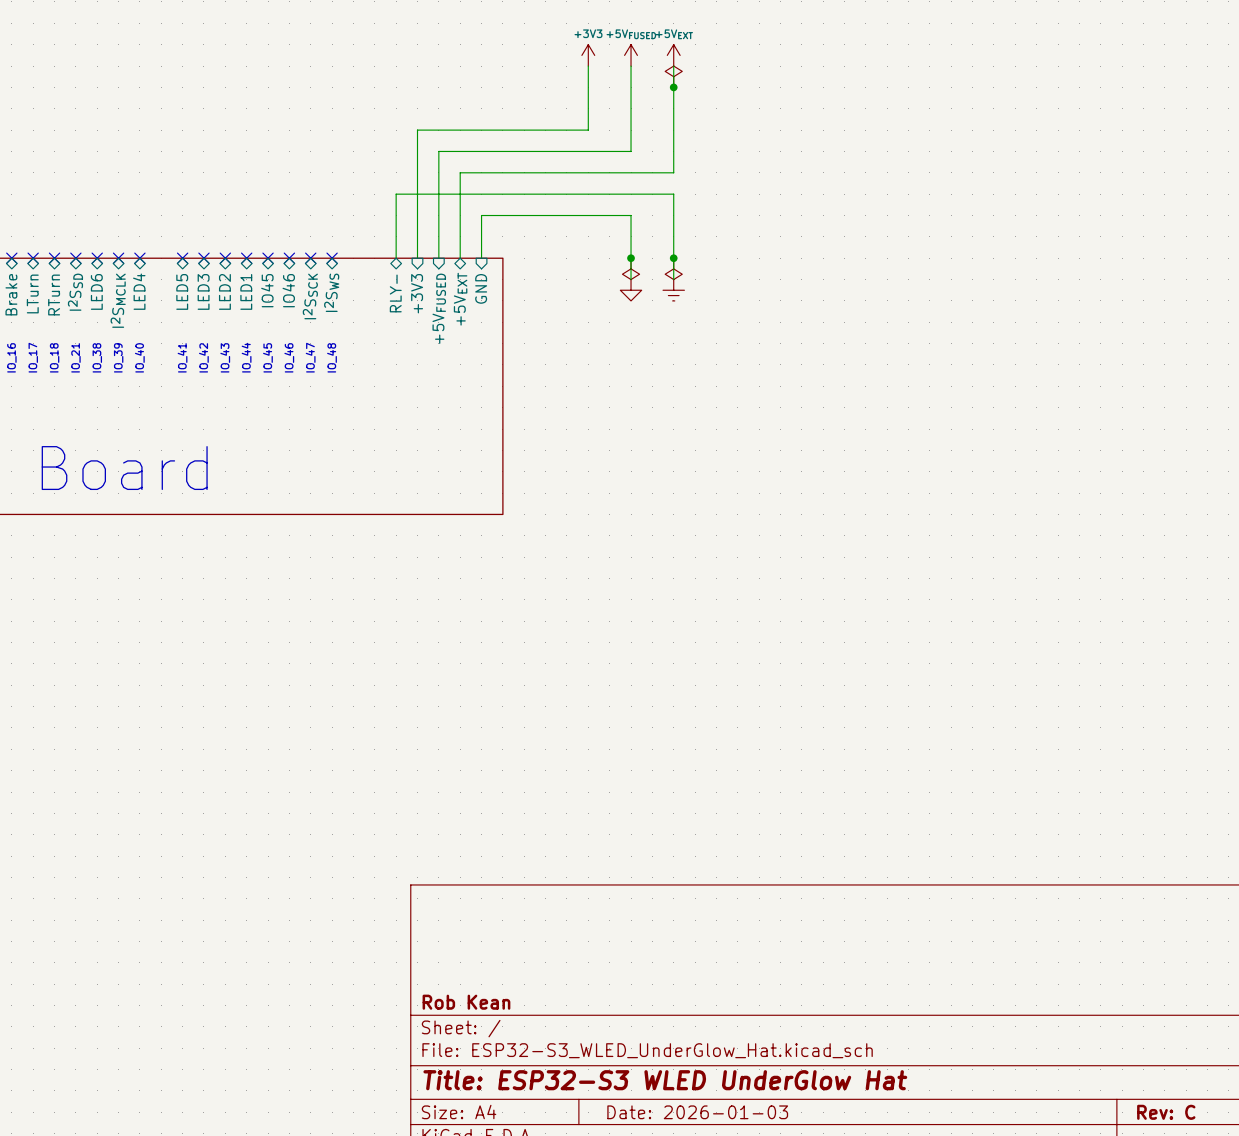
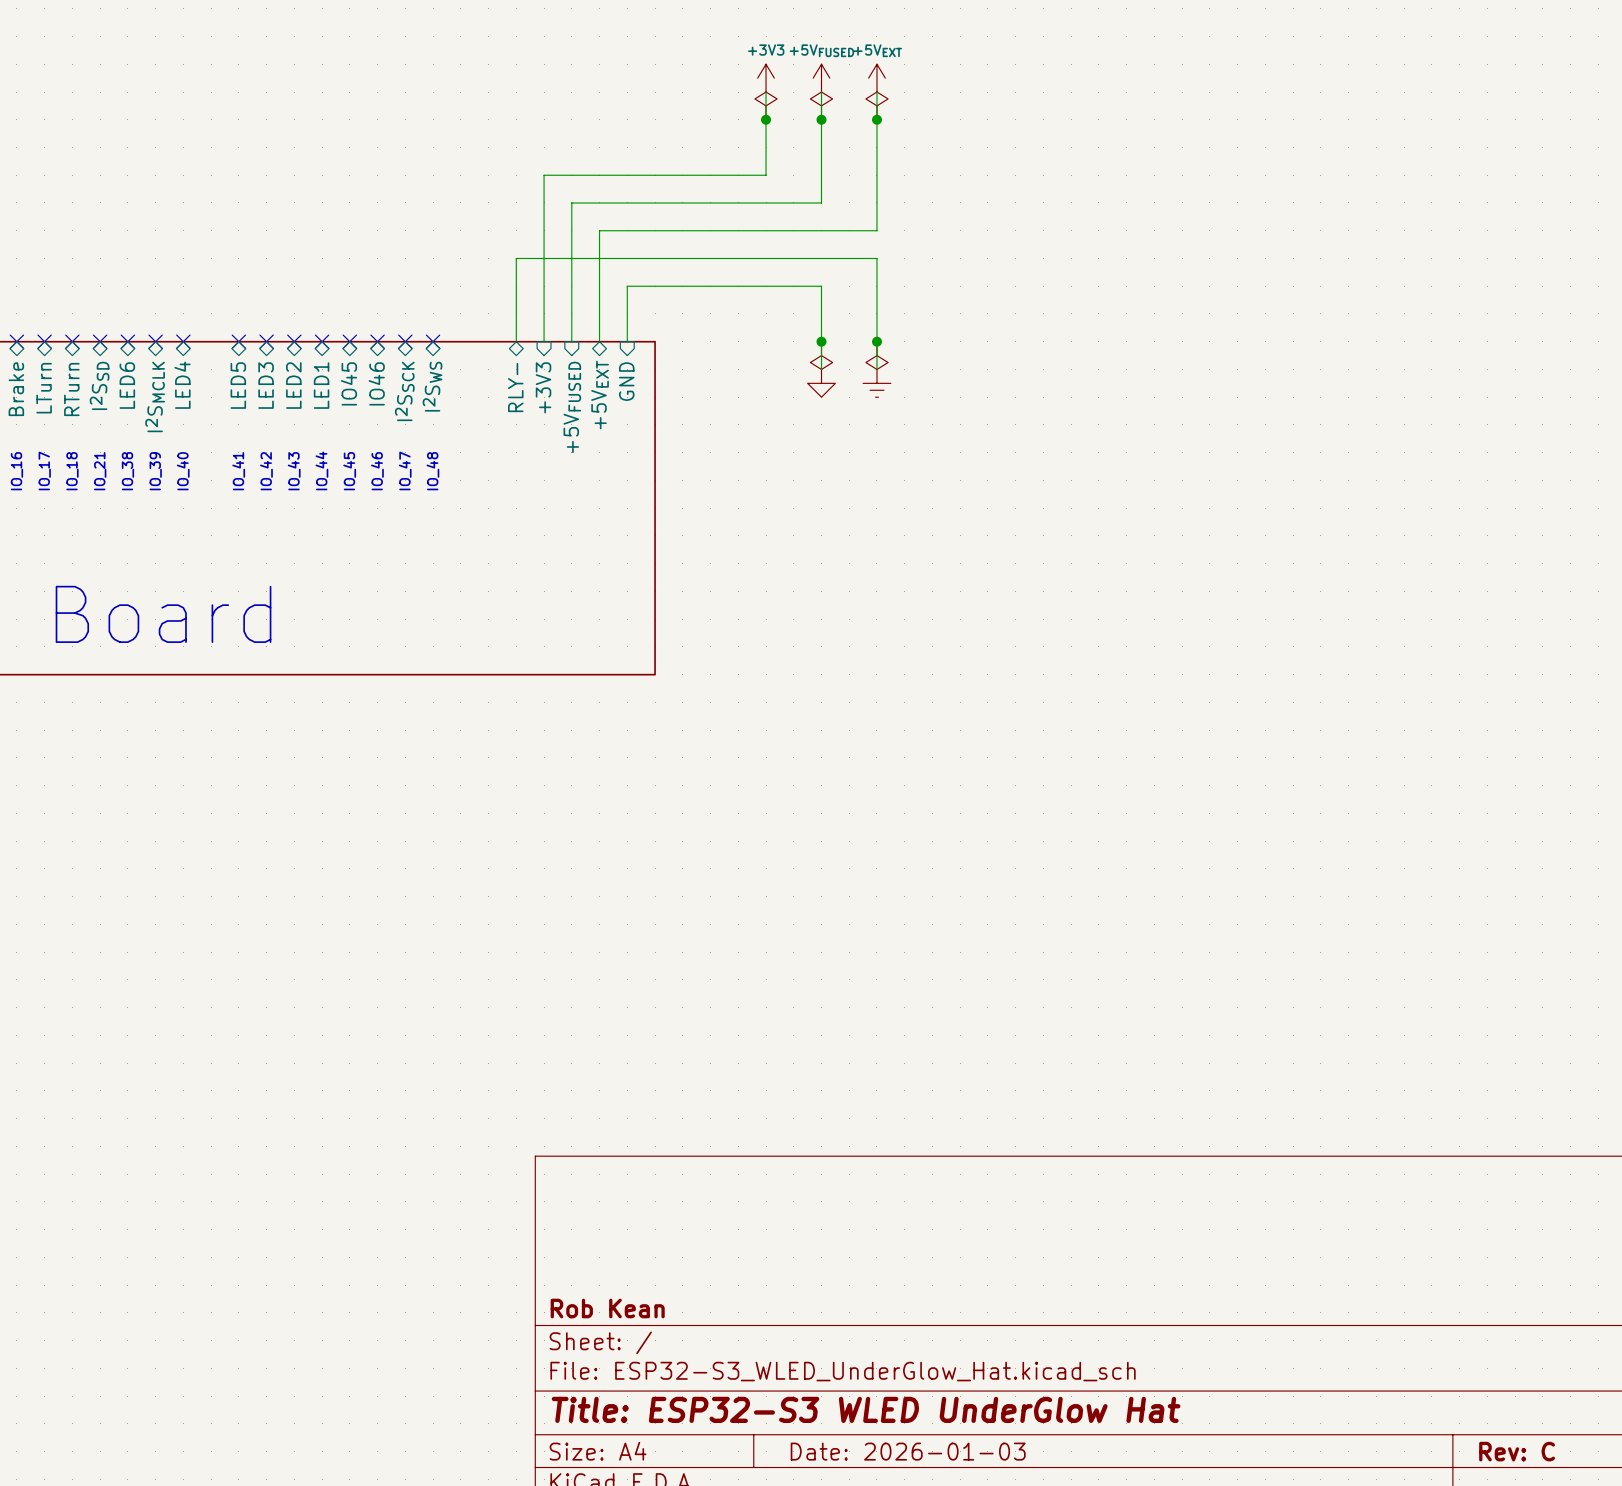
power symbol: none -> (766, 105)
power symbol: none -> (821, 105)
junction: none -> (766, 119)
junction: none -> (821, 119)

